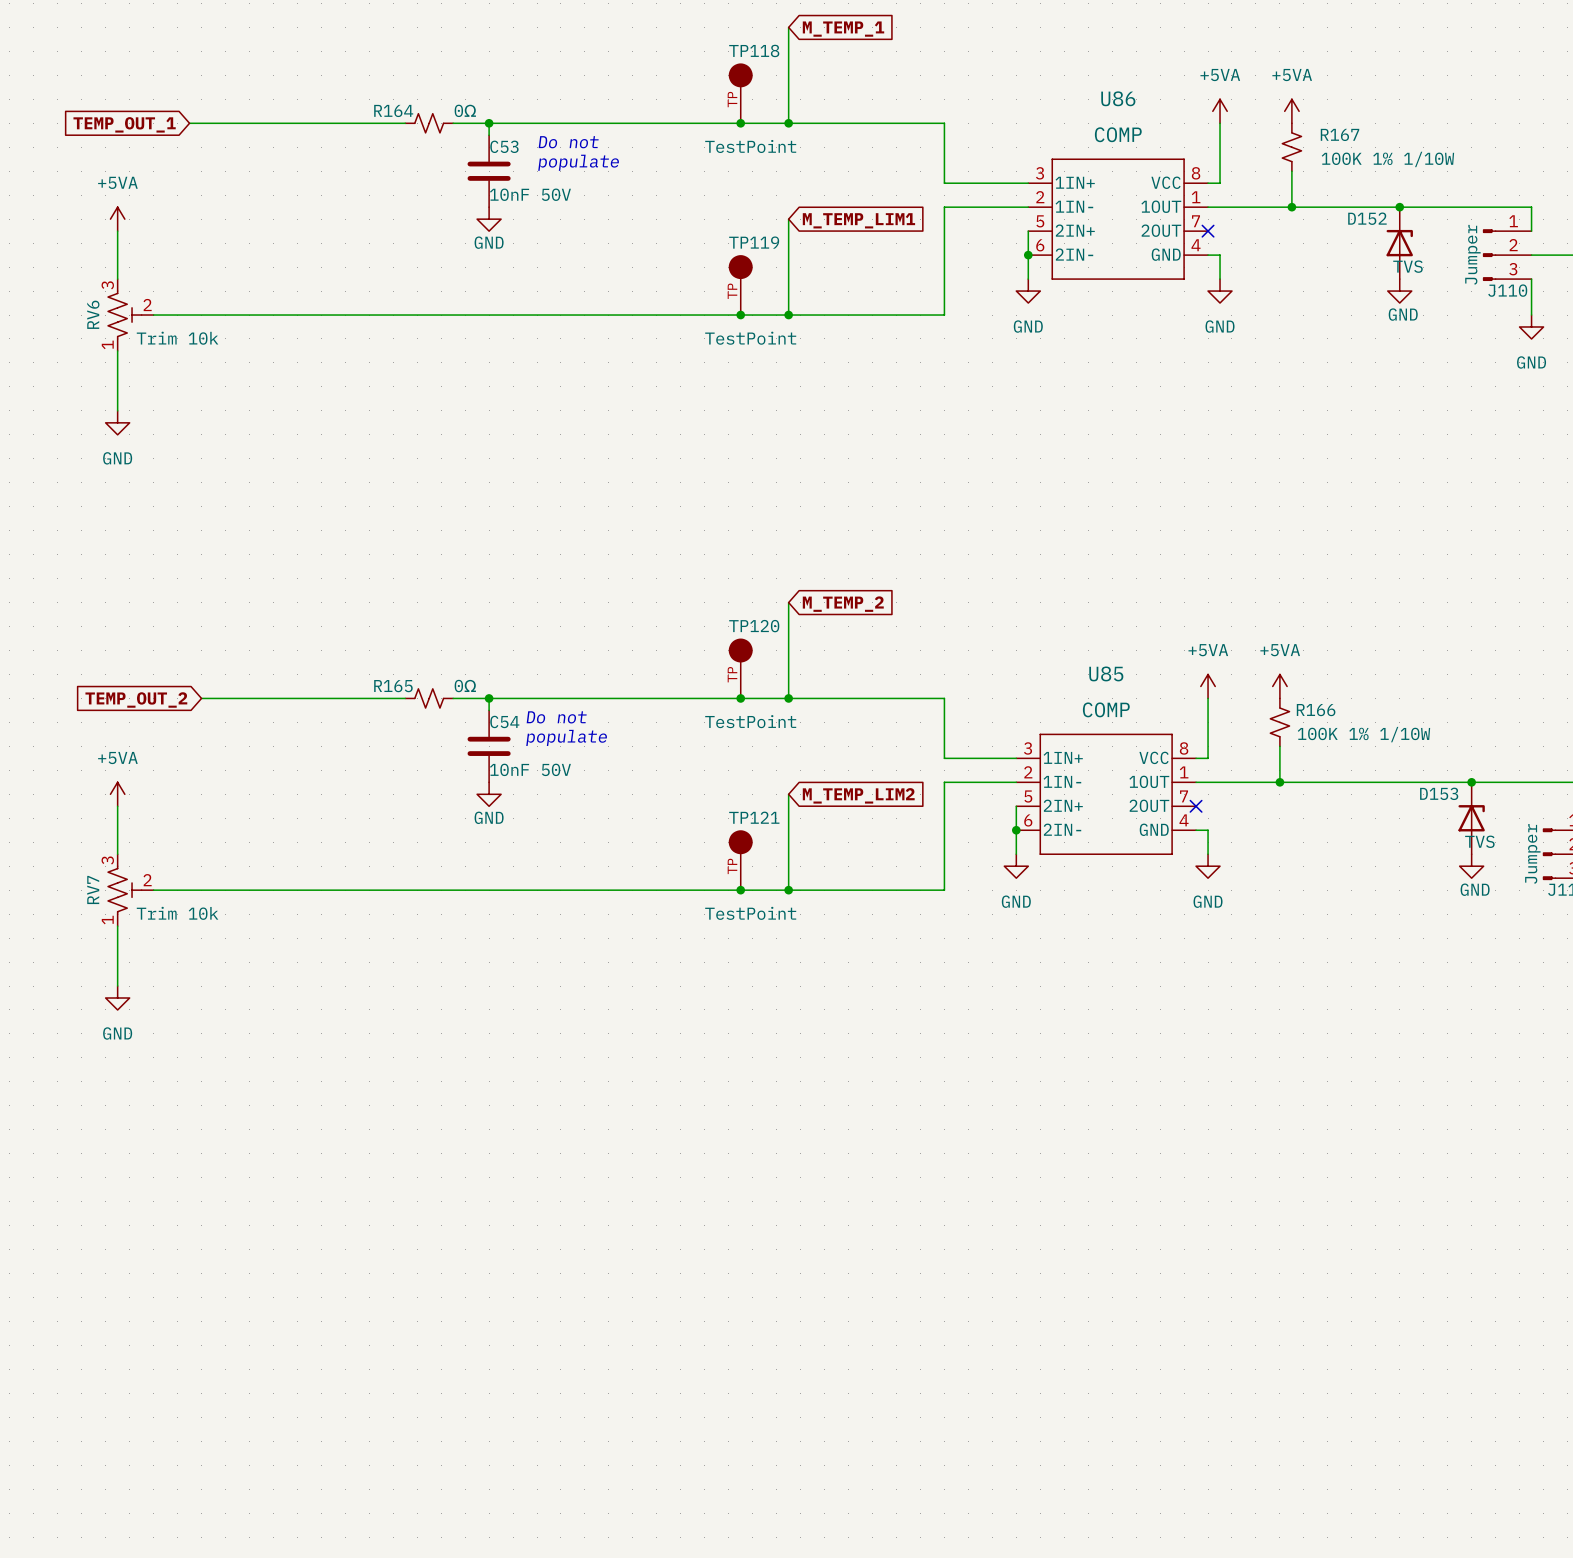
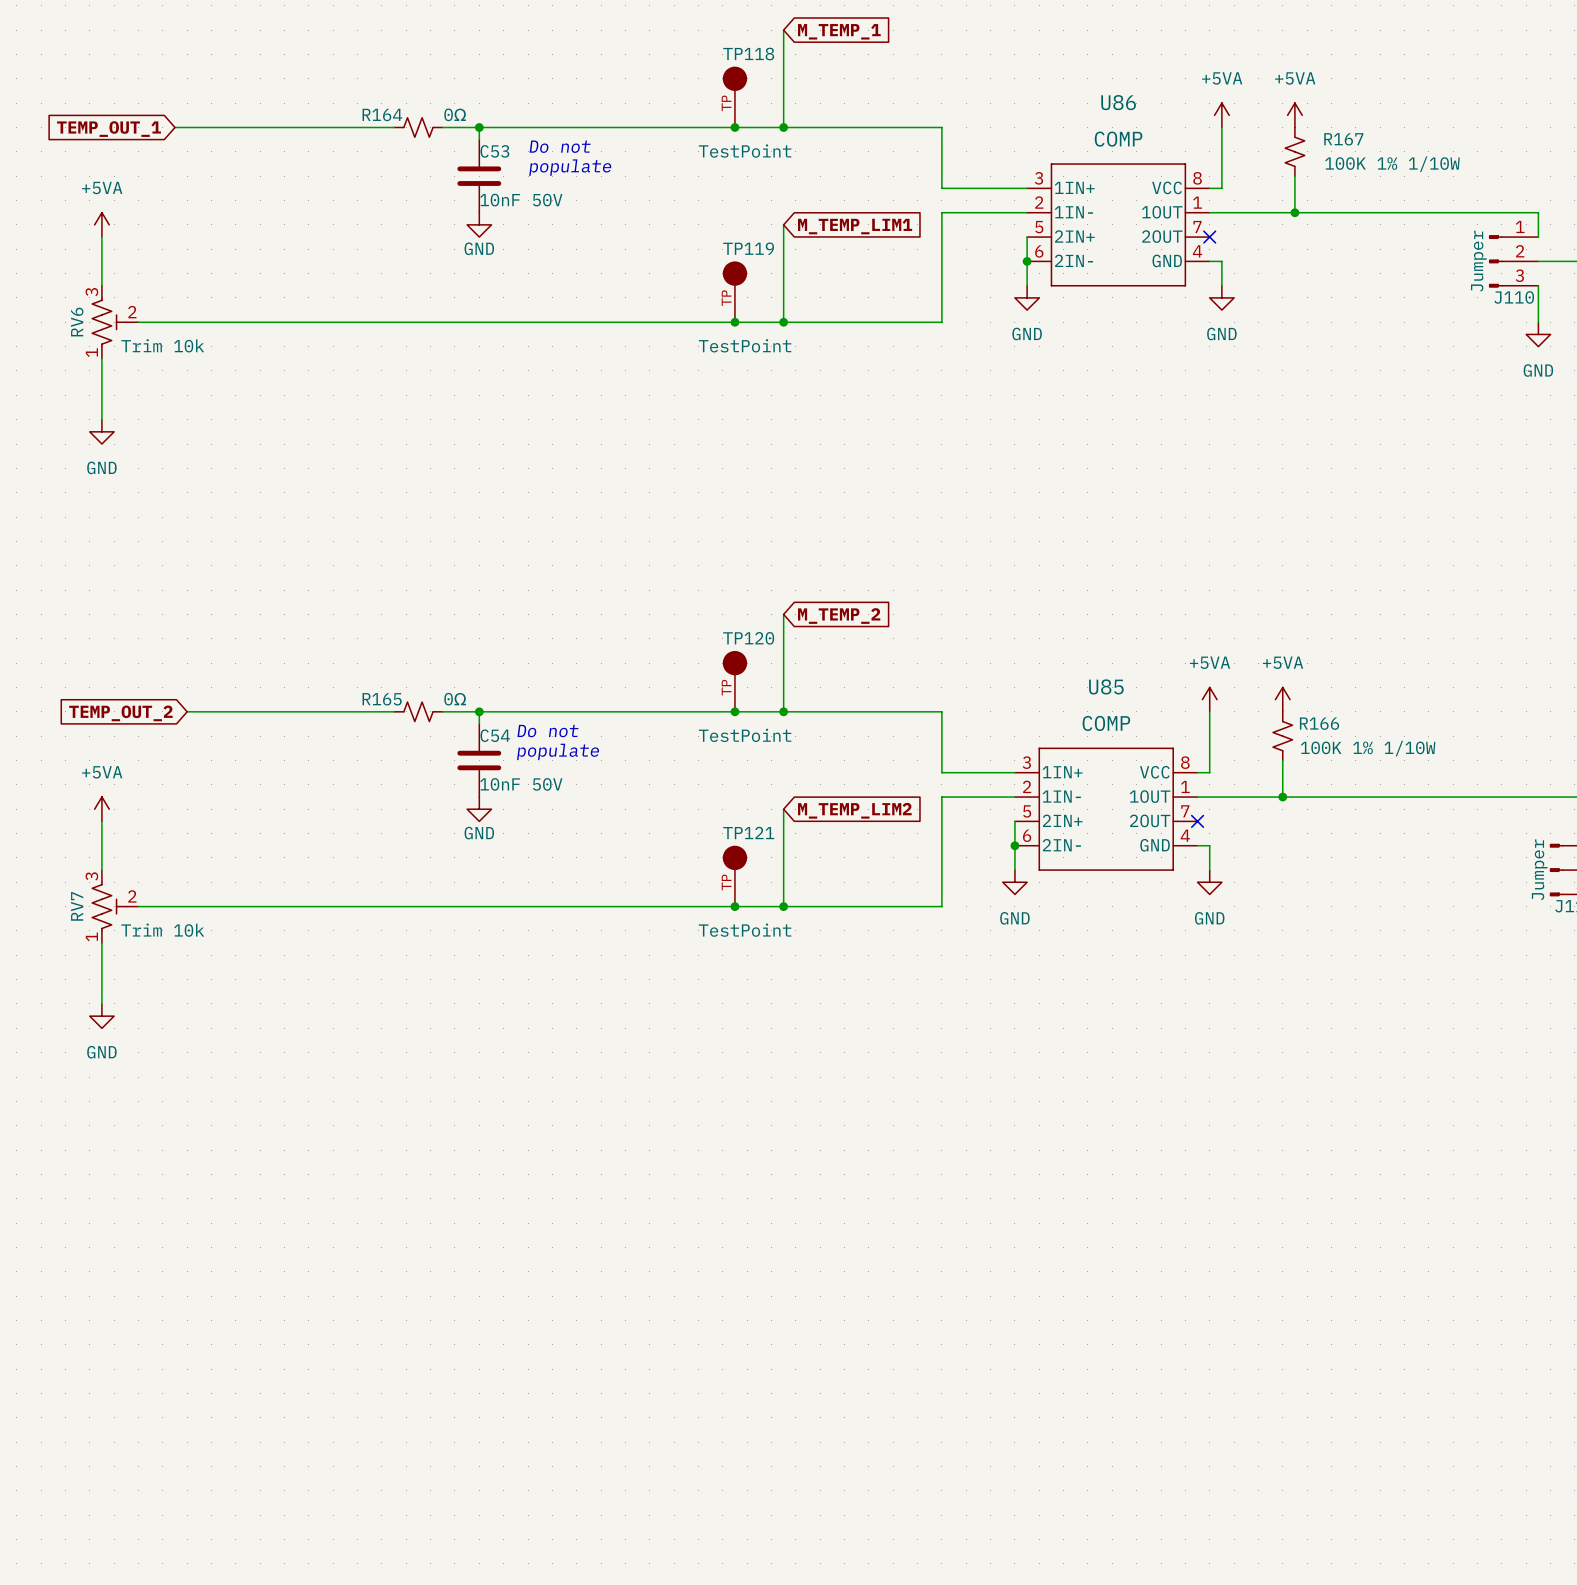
junction: (1399, 207) -> none
D152: TVS (1399, 243) -> none
power symbol: GND (1399, 291) -> none
junction: (1471, 782) -> none
D153: TVS (1471, 818) -> none
power symbol: GND (1471, 866) -> none

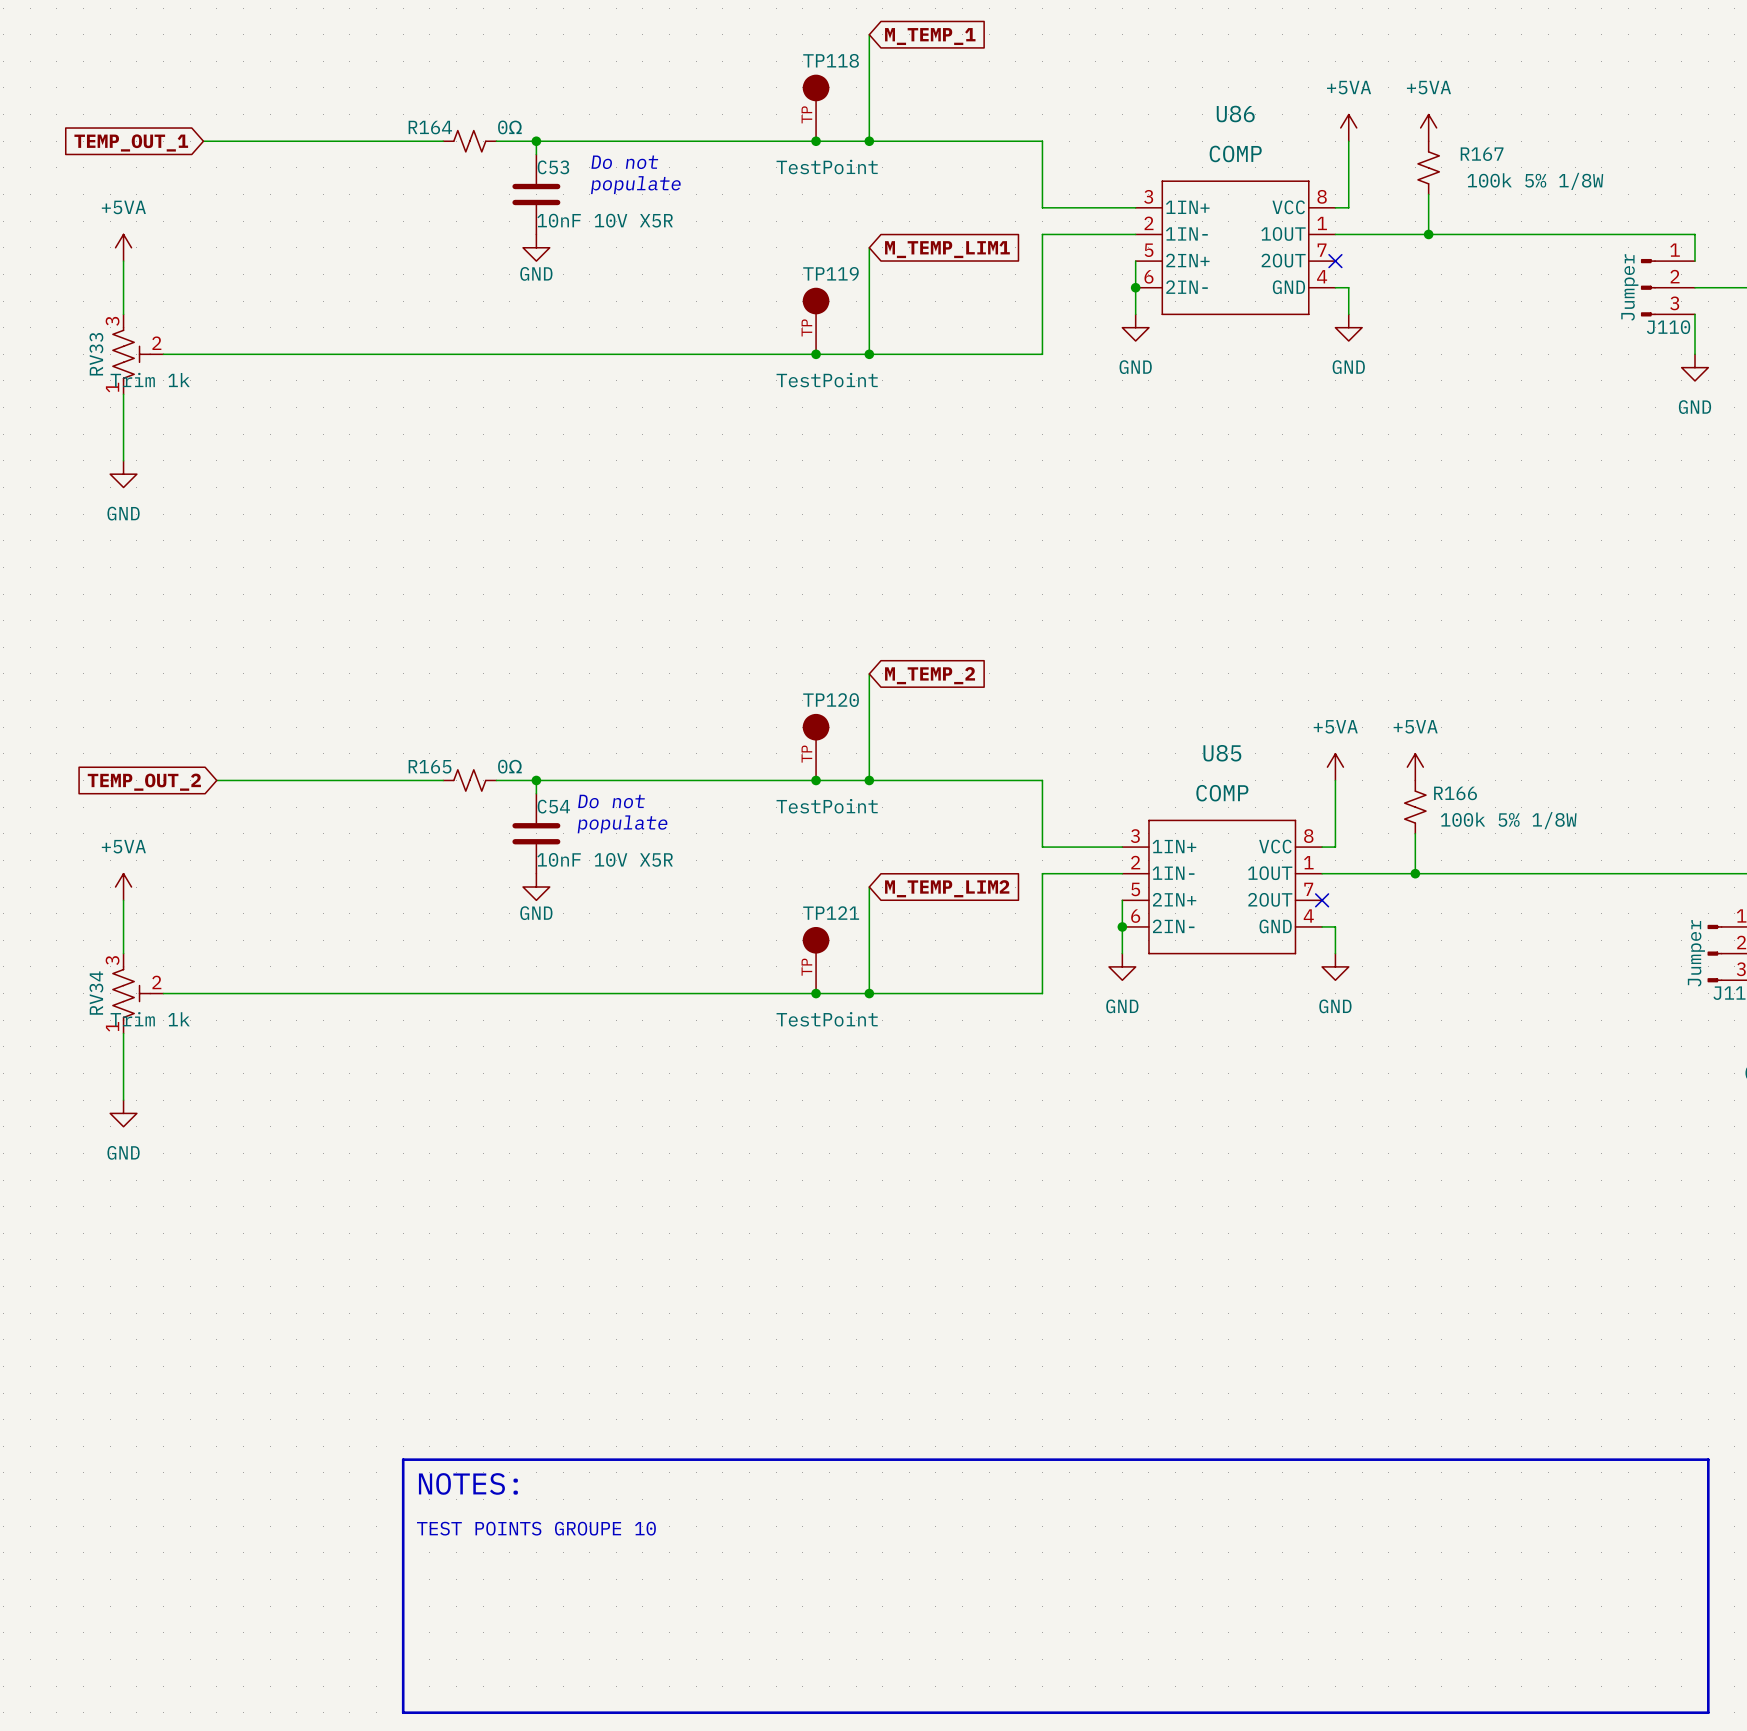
R167 value: 100K 1% 1/10W (1392, 164) -> 100k 5% 1/8W (1535, 181)
C53 value: 10nF 50V (521, 200) -> 10nF 10V X5R (605, 220)
RV6 name: RV6 (77, 322) -> RV33 (96, 354)
RV6 value: Trim 10k (162, 345) -> Trim 1k (150, 379)
R166 value: 100K 1% 1/10W (1368, 748) -> 100k 5% 1/8W (1508, 820)
C54 value: 10nF 50V (521, 784) -> 10nF 10V X5R (605, 859)
RV7 name: RV7 (77, 906) -> RV34 (96, 993)
RV7 value: Trim 10k (162, 930) -> Trim 1k (150, 1019)
line: none -> (403, 1459) (403, 1712) (1708, 1712) (1708, 1459) (403, 1459)
text: none -> NOTES: (468, 1483)
text: none -> TEST POINTS GROUPE 10 (536, 1528)

